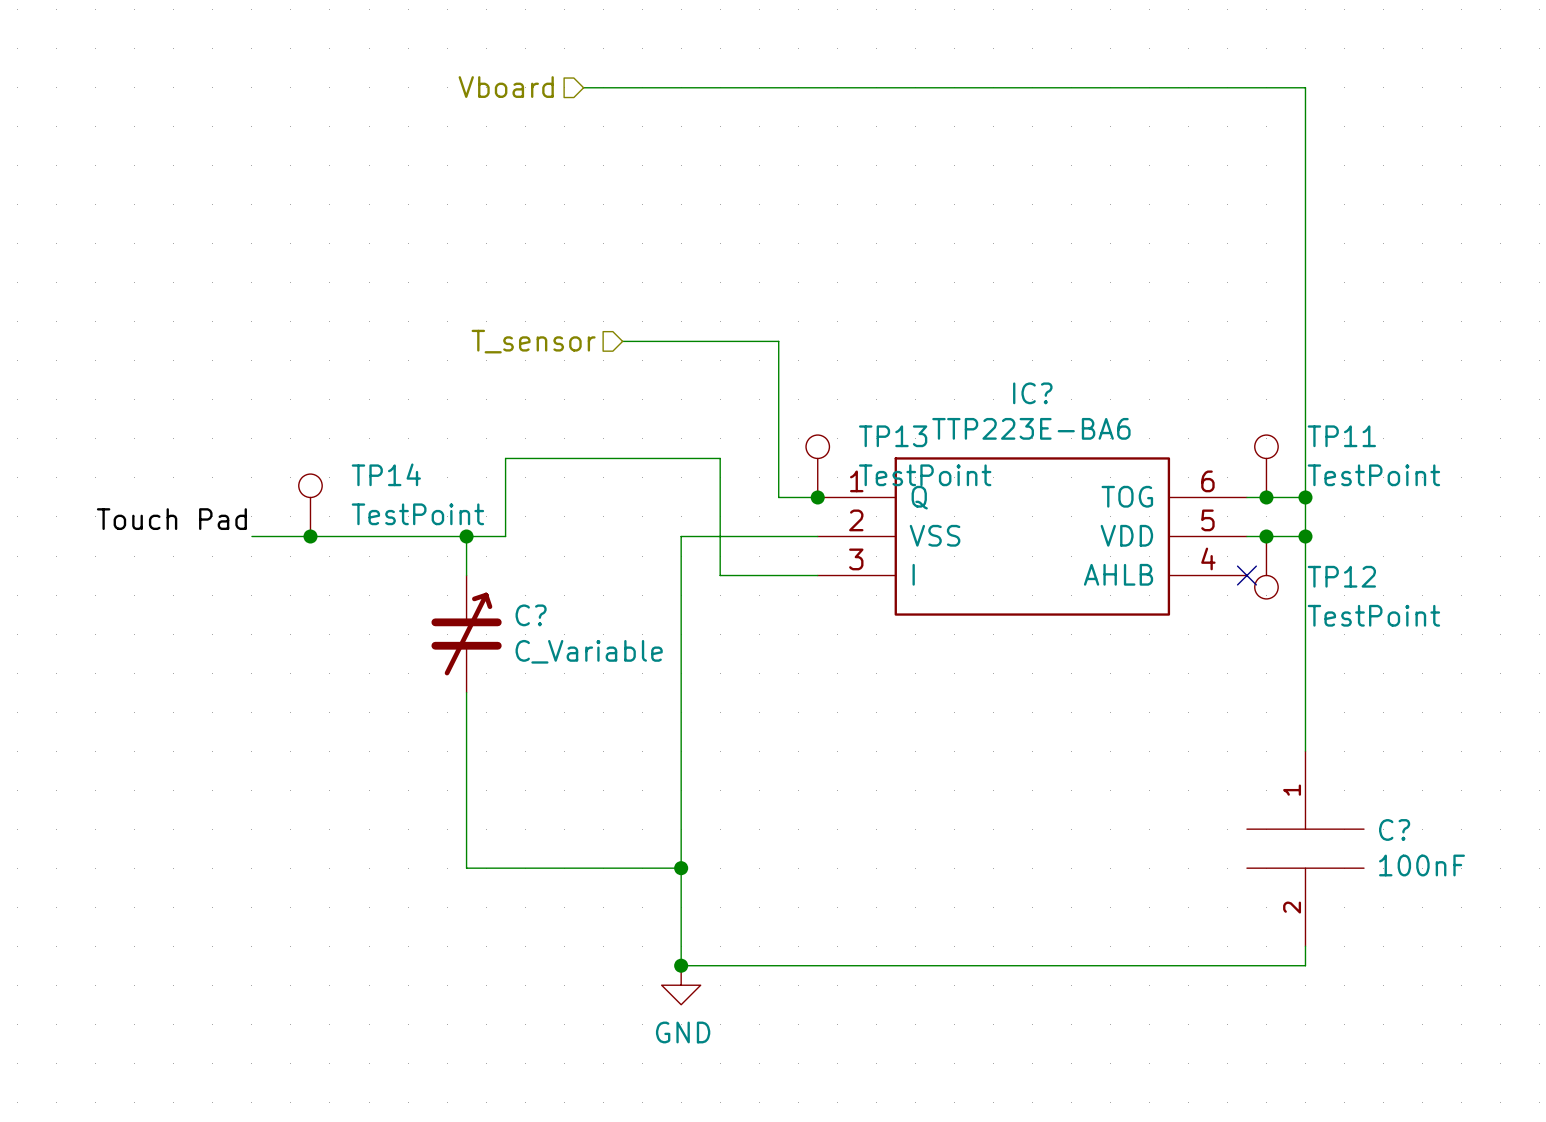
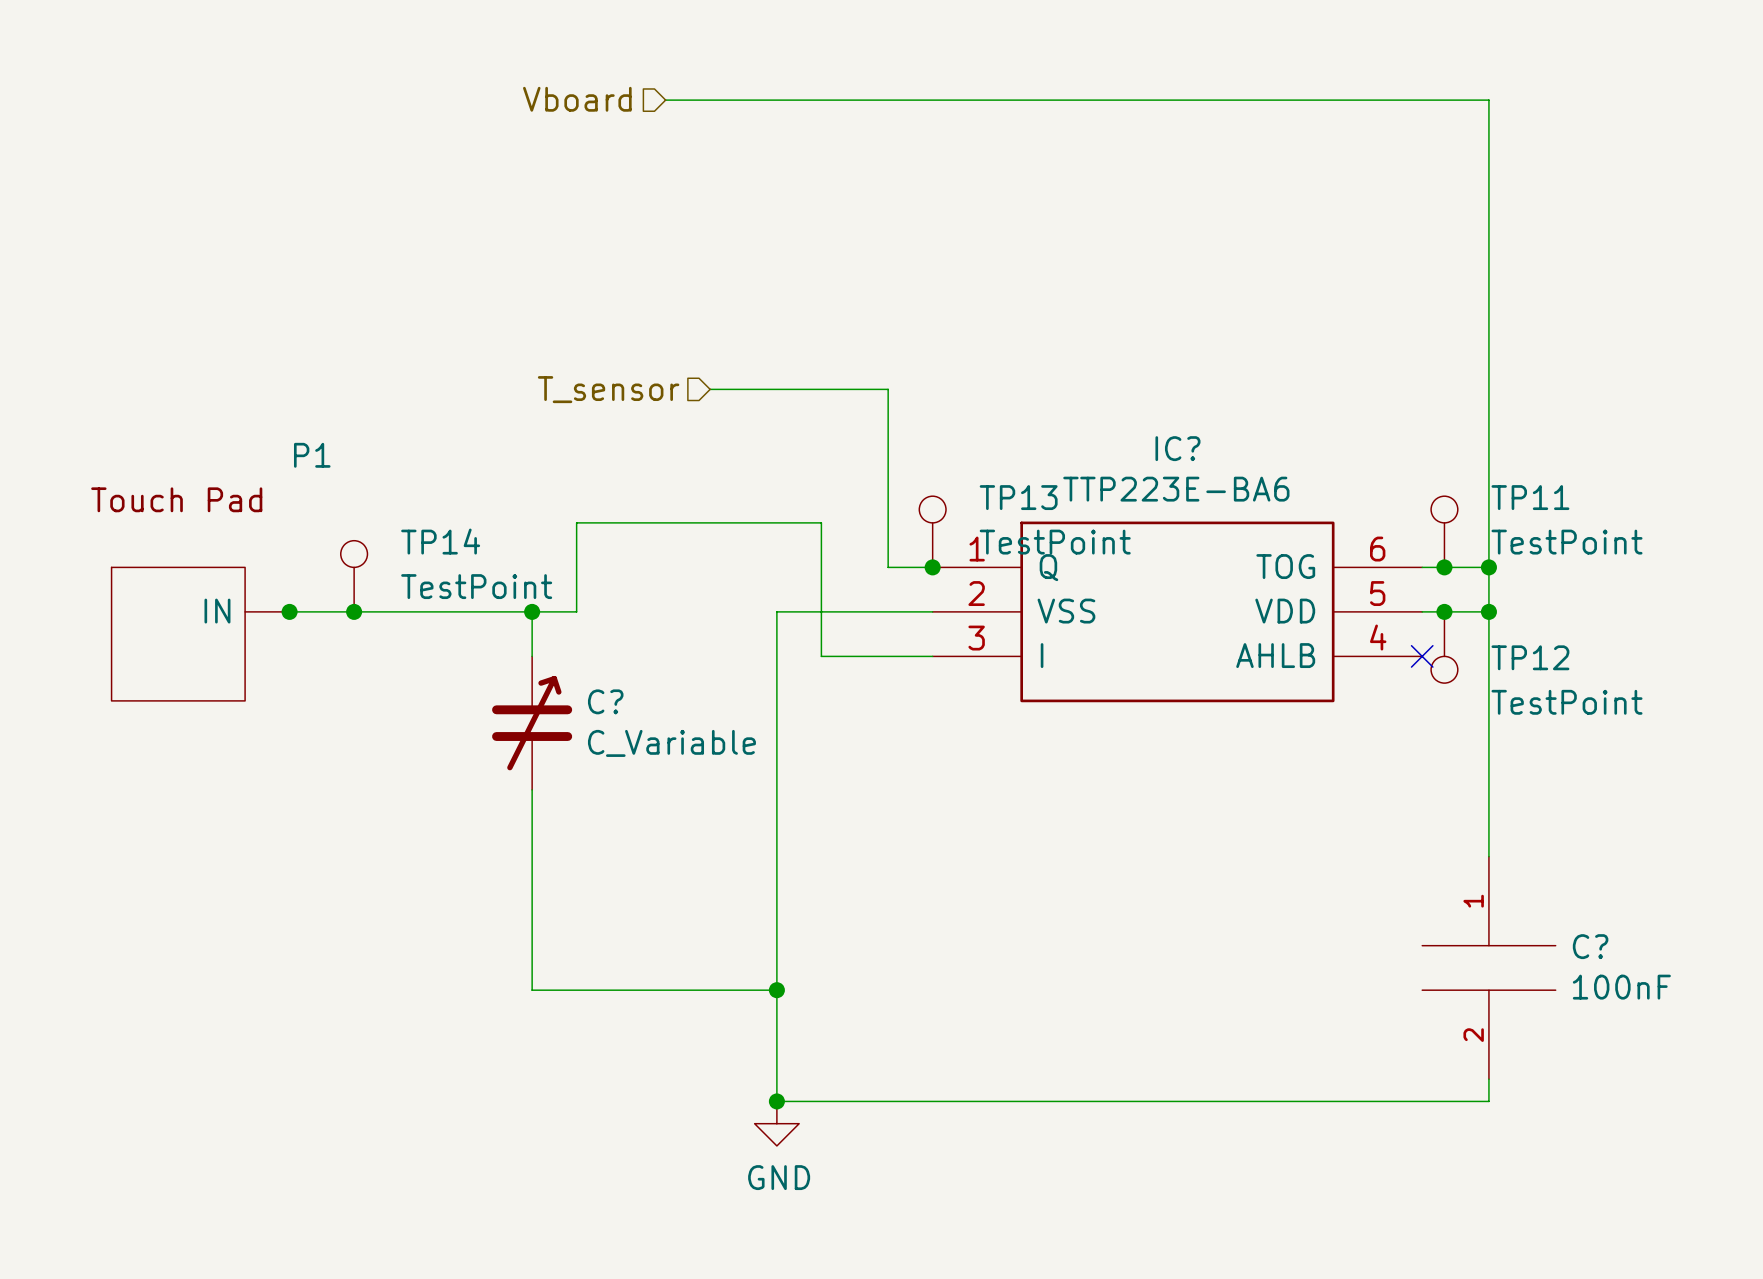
label: Touch Pad (171, 519) -> none
junction: none -> (289, 611)
P1: none -> (322, 778)

